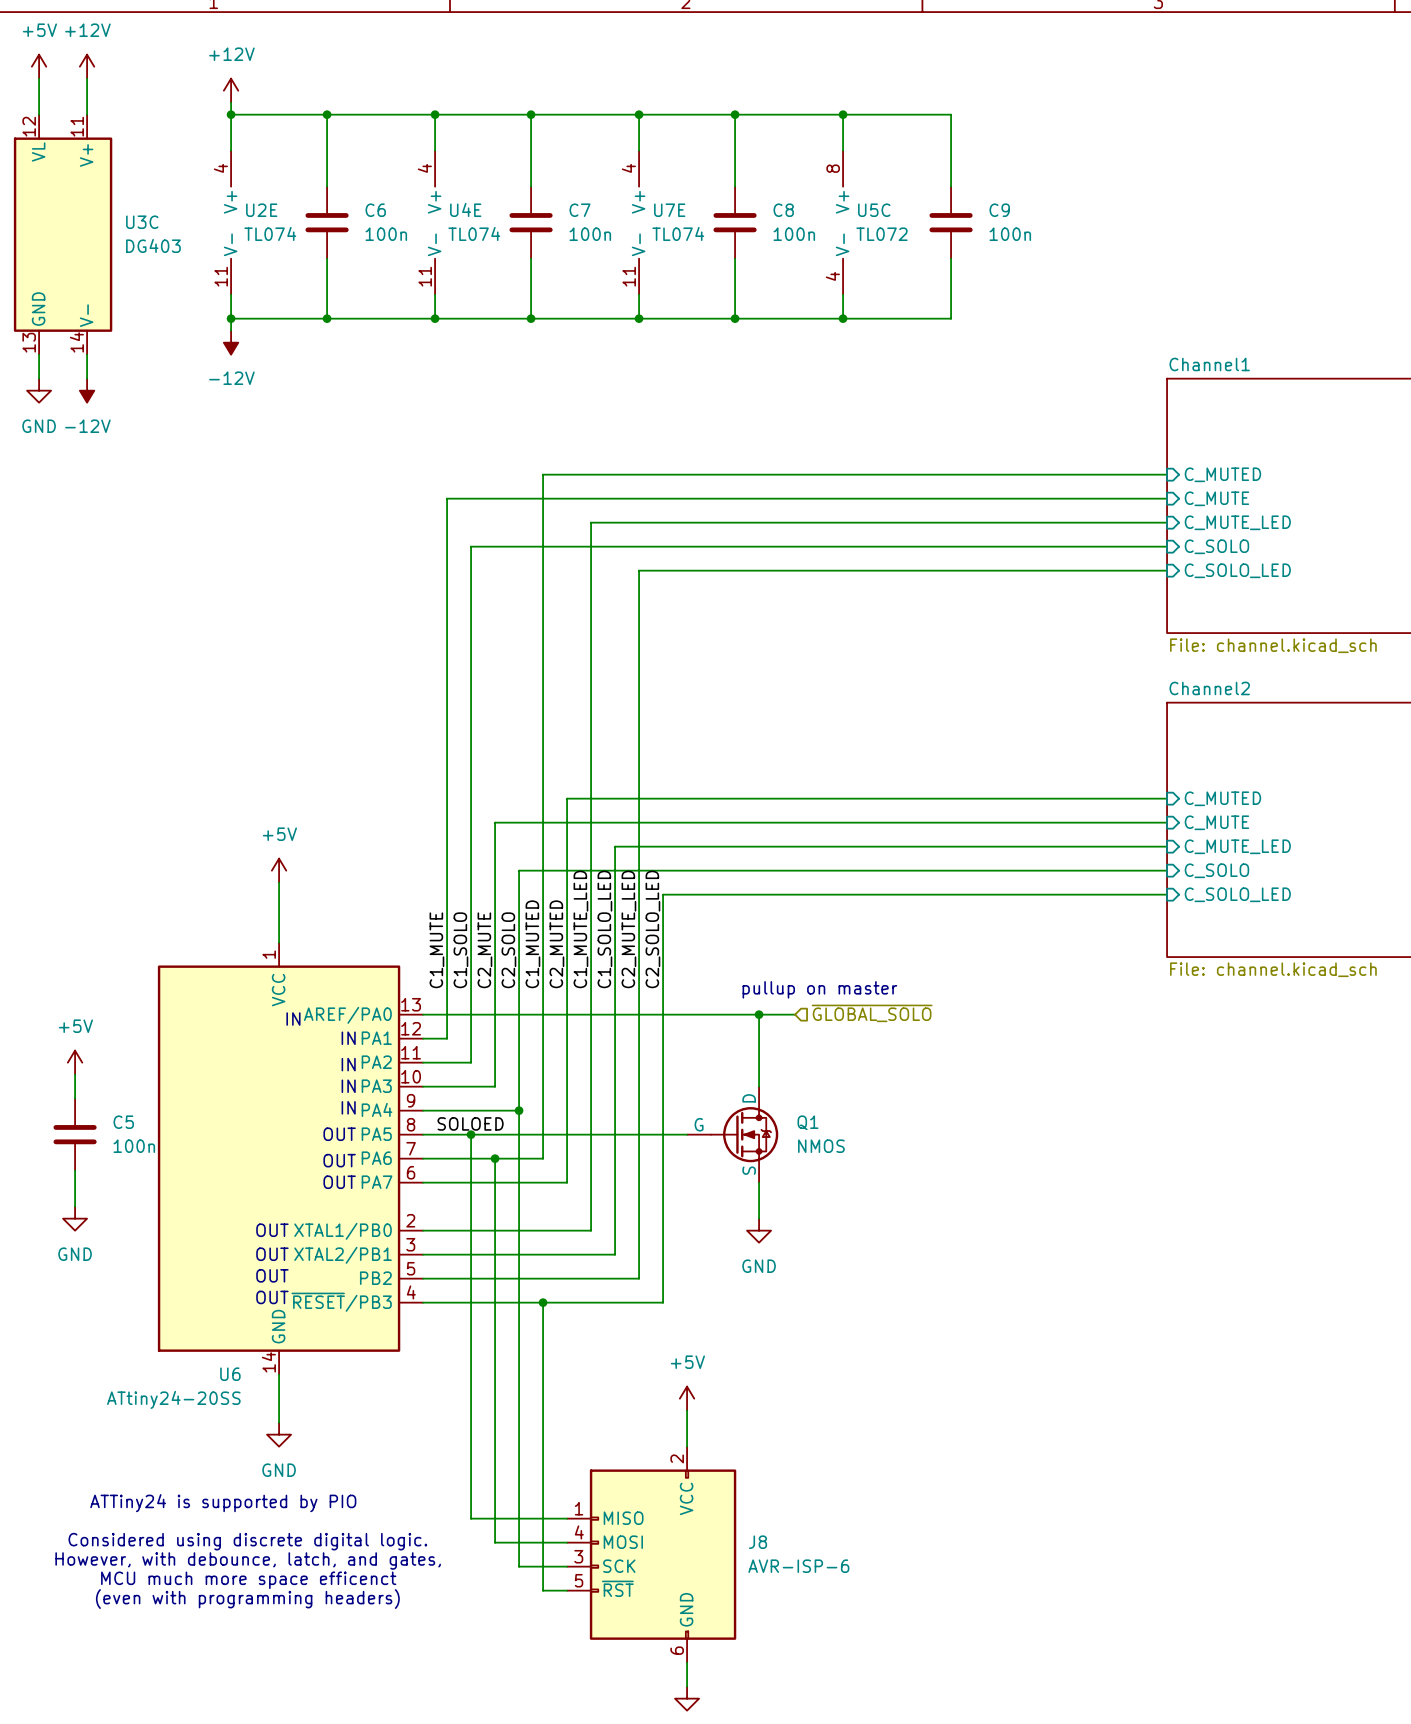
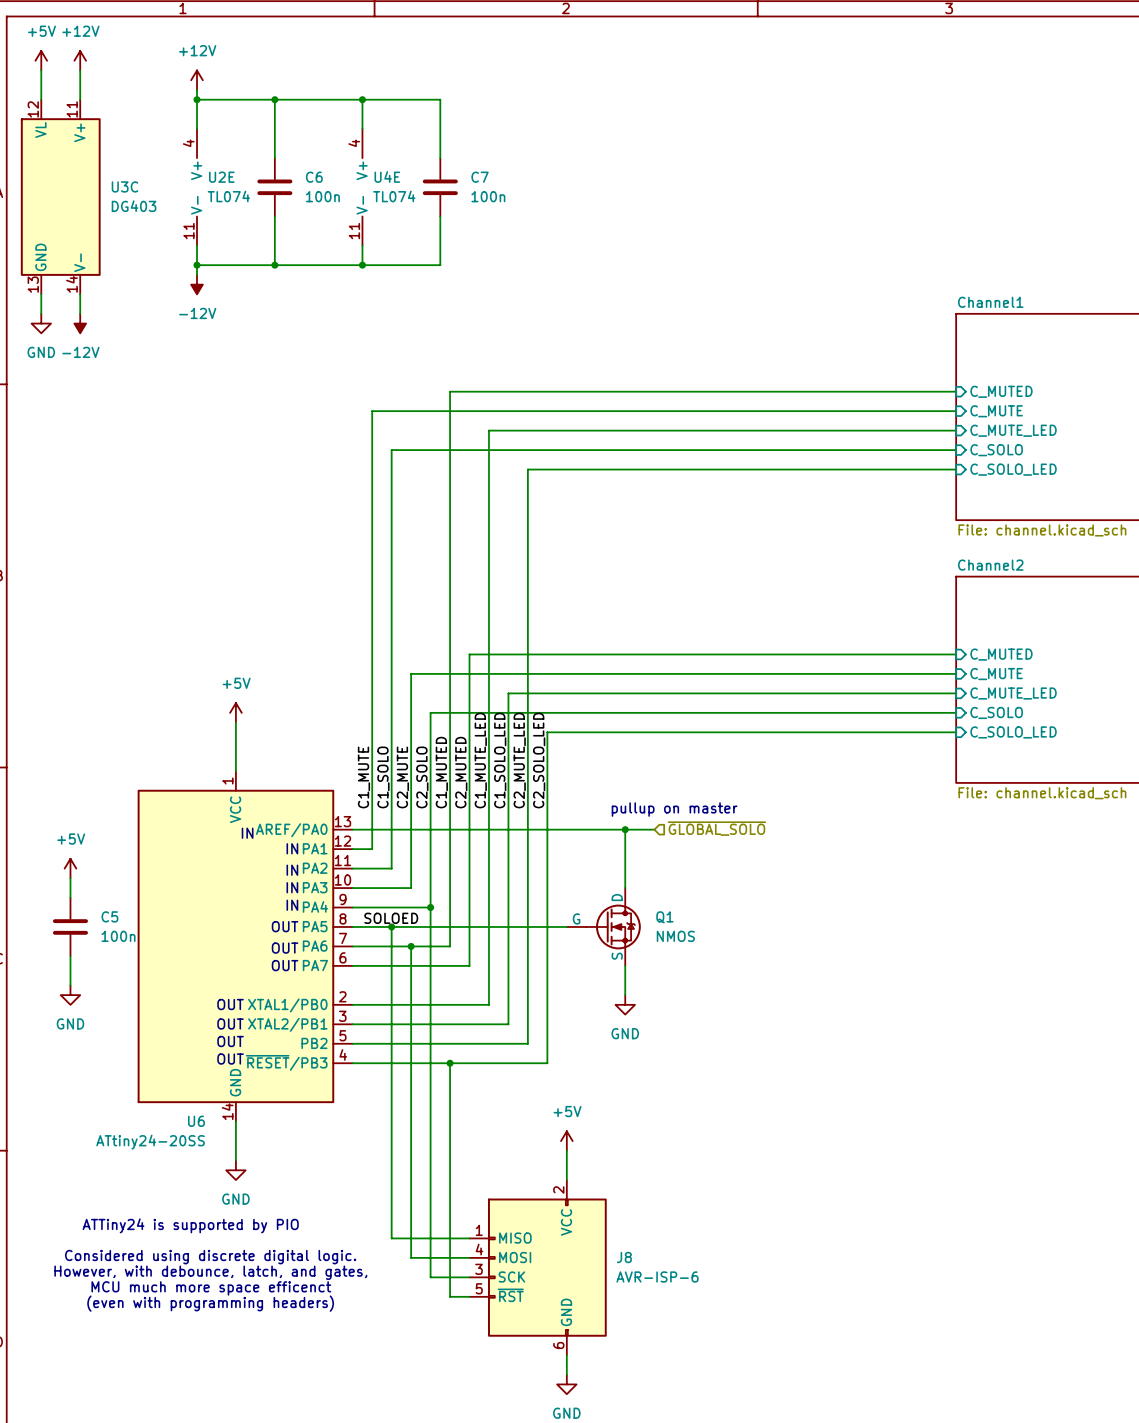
wire: (531, 114) (951, 114) (951, 186) -> none
junction: (531, 114) -> none
wire: (639, 114) (639, 150) -> none
junction: (639, 114) -> none
wire: (735, 114) (735, 186) -> none
junction: (735, 114) -> none
wire: (843, 114) (843, 150) -> none
junction: (843, 114) -> none
U7E: TL074 (639, 222) -> none
C8: 100n (735, 222) -> none
U5C: TL072 (843, 222) -> none
C9: 100n (951, 222) -> none
wire: (735, 258) (735, 318) -> none
wire: (951, 258) (951, 318) (531, 318) -> none
wire: (639, 294) (639, 318) -> none
wire: (843, 294) (843, 318) -> none
junction: (531, 318) -> none
junction: (639, 318) -> none
junction: (735, 318) -> none
junction: (843, 318) -> none

